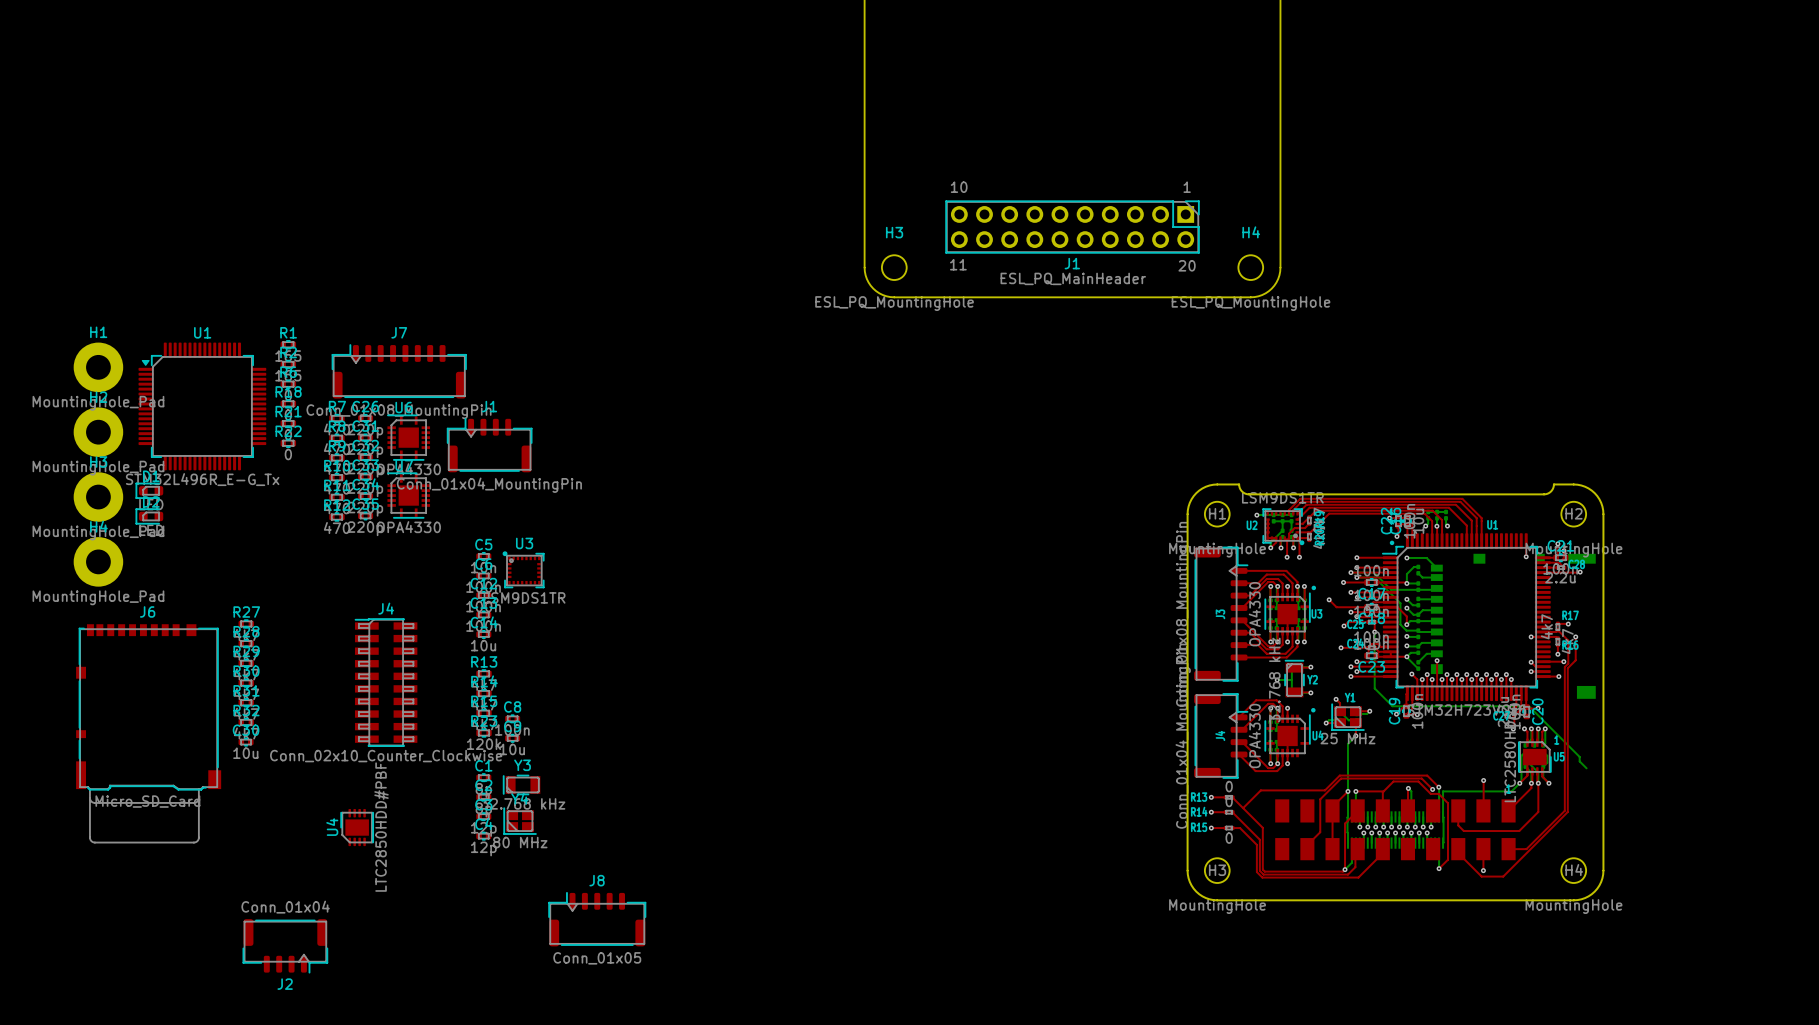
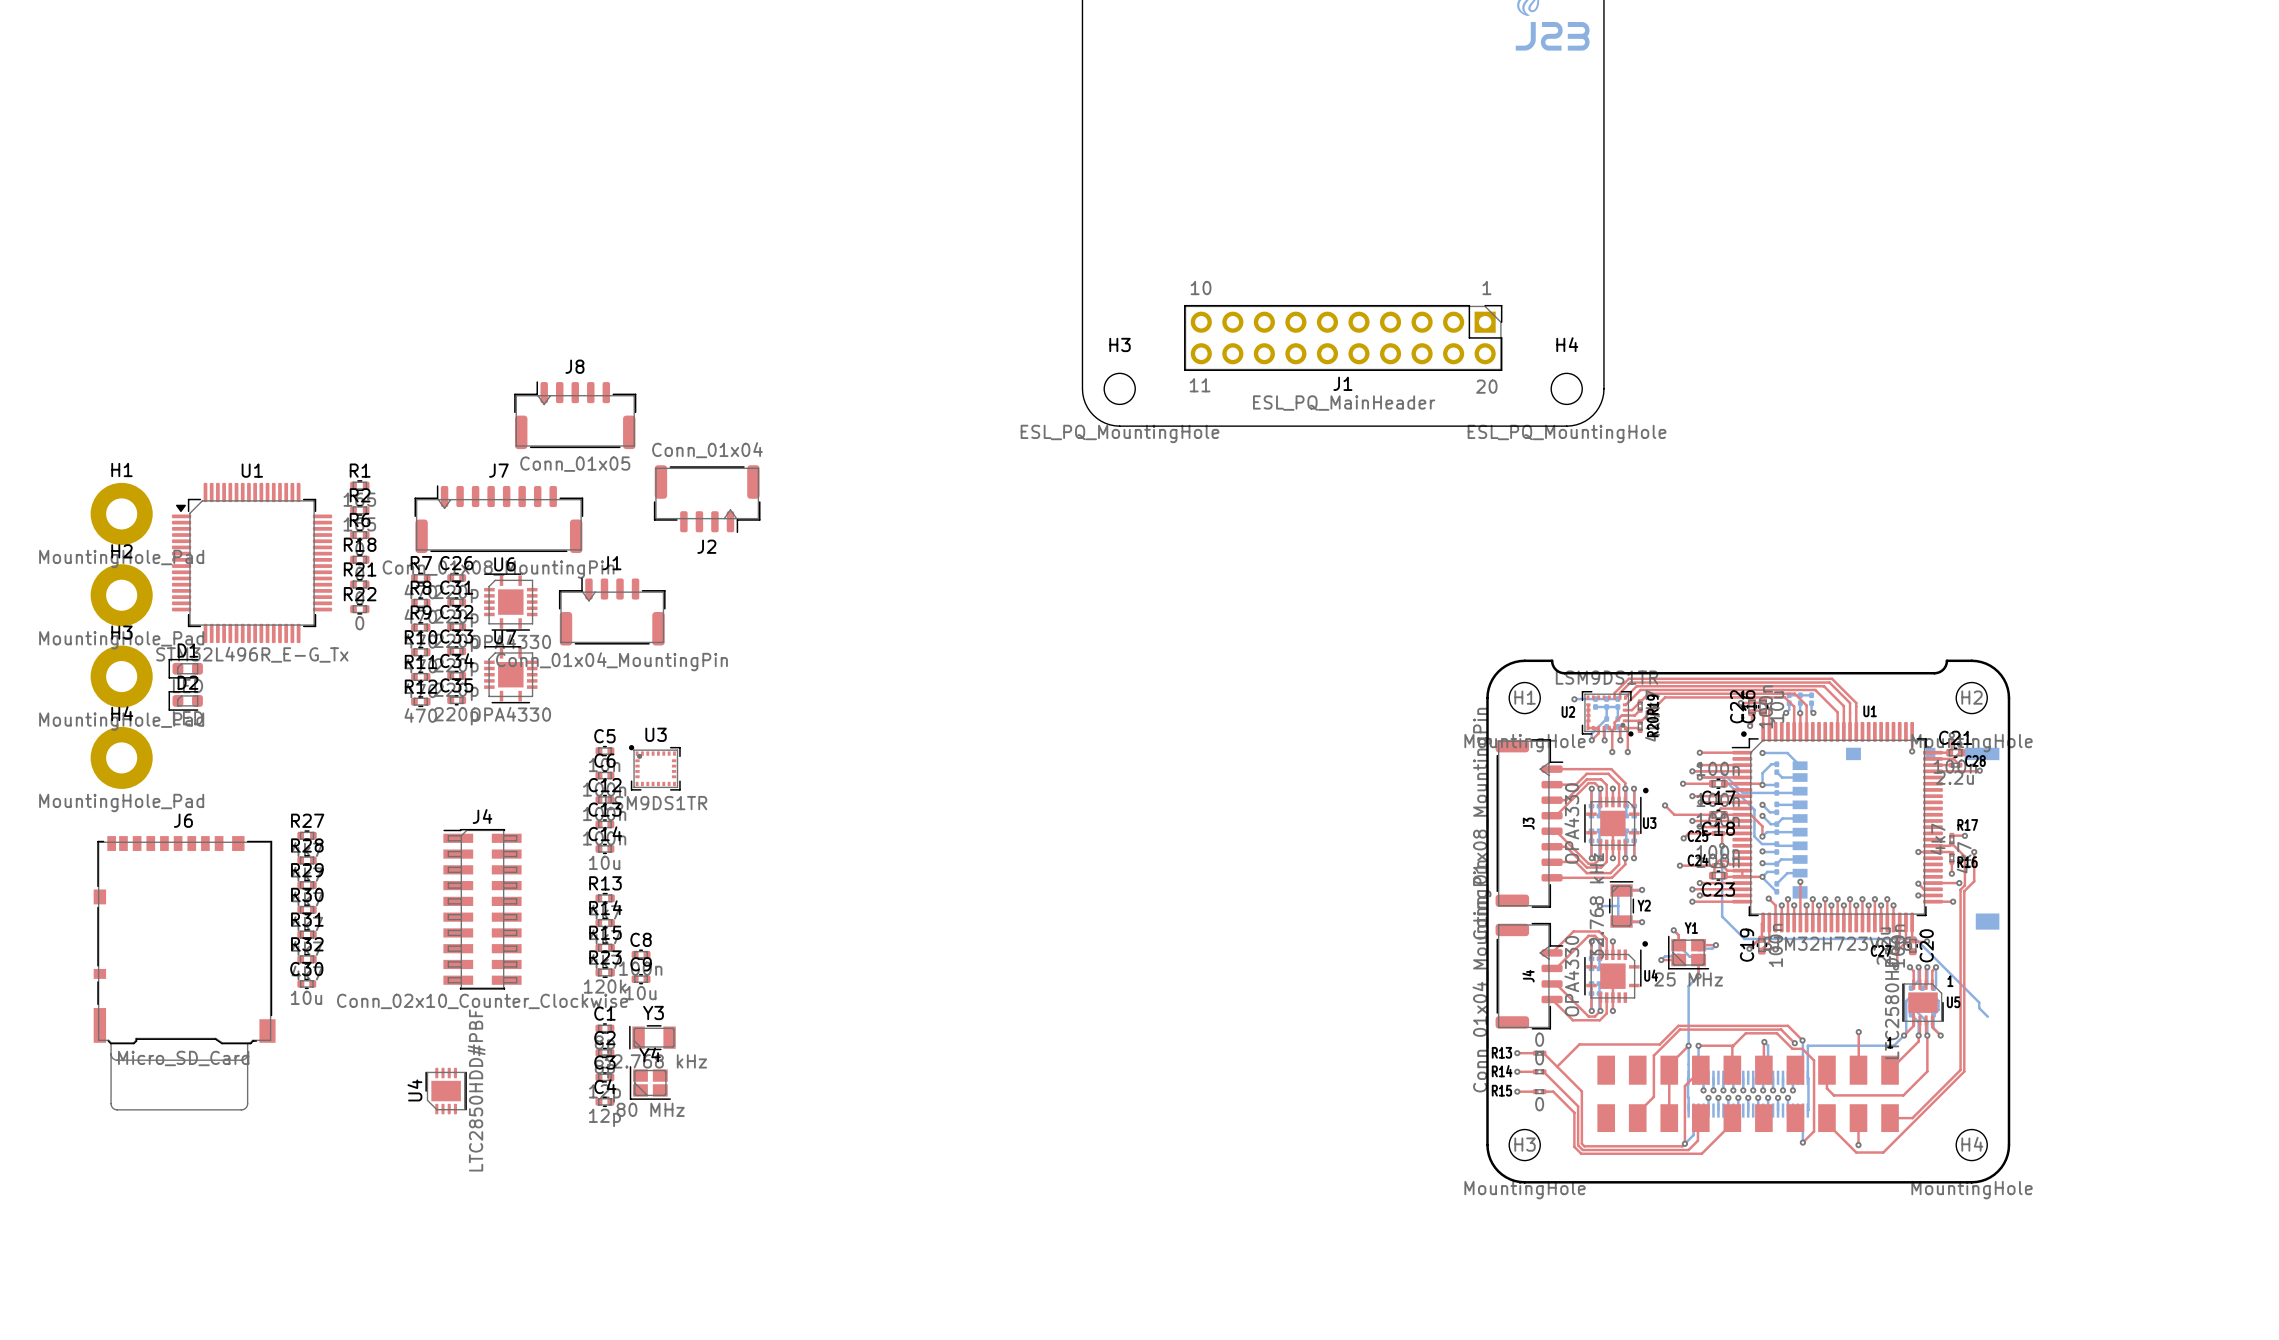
J8 position: (597, 919) -> (575, 415)
J2 position: (285, 946) -> (707, 499)

